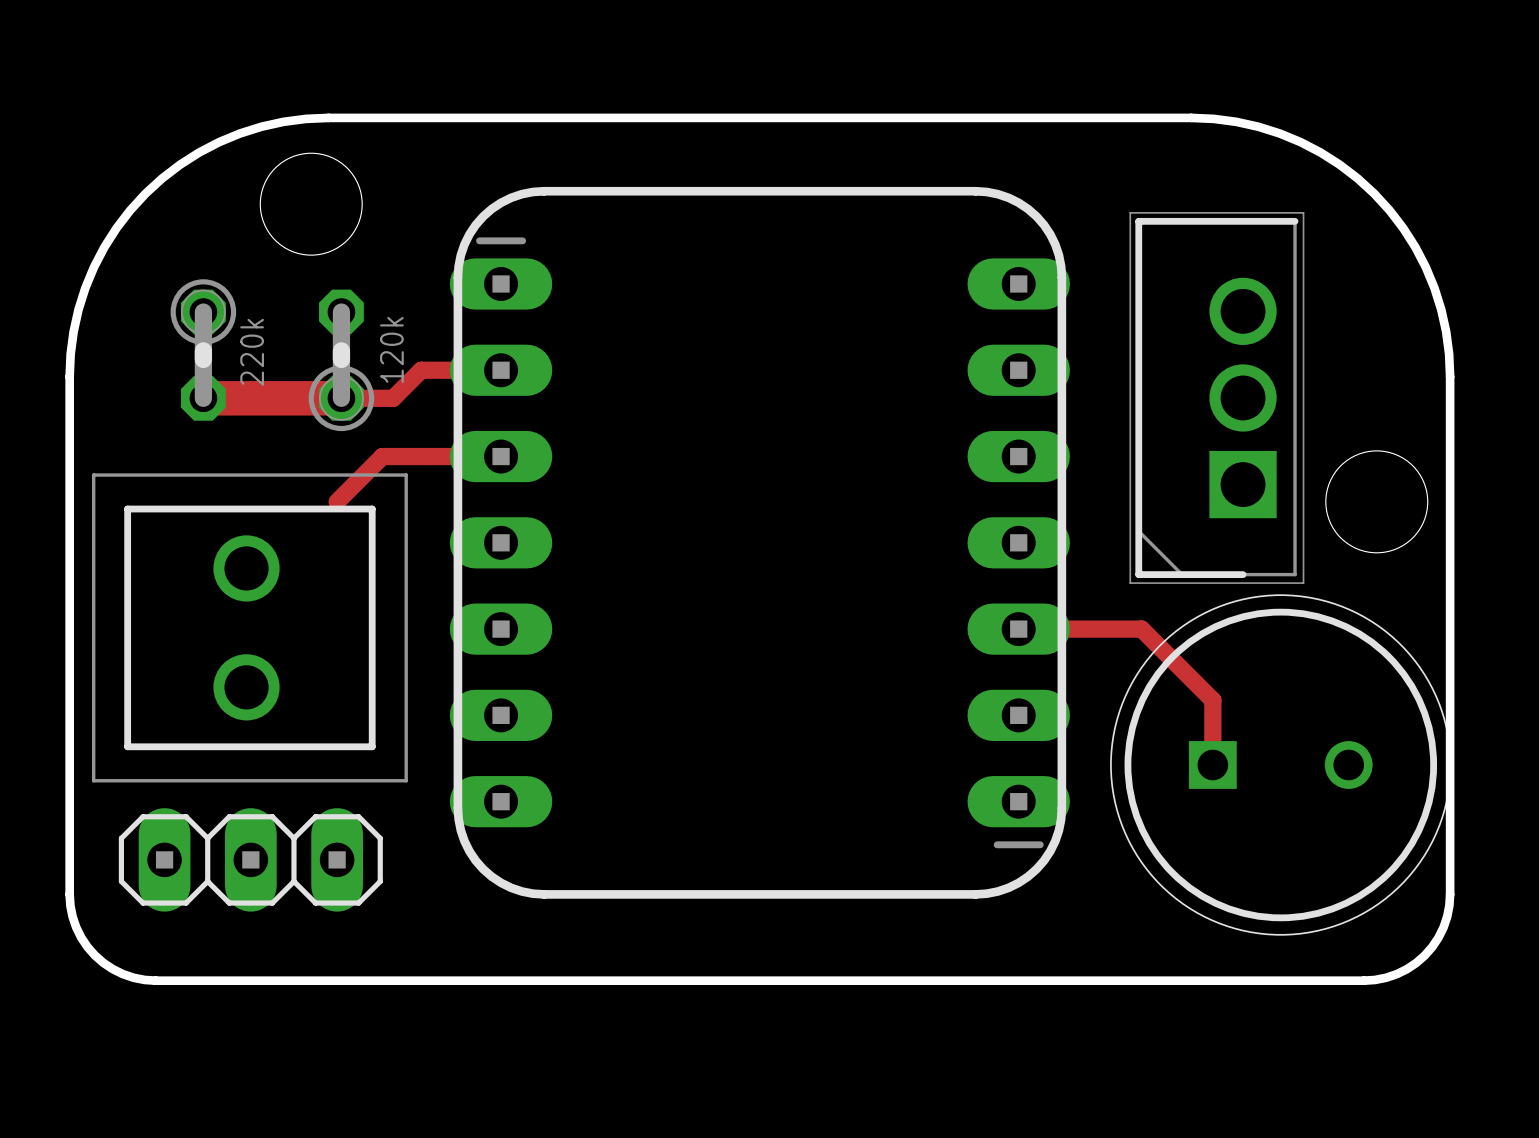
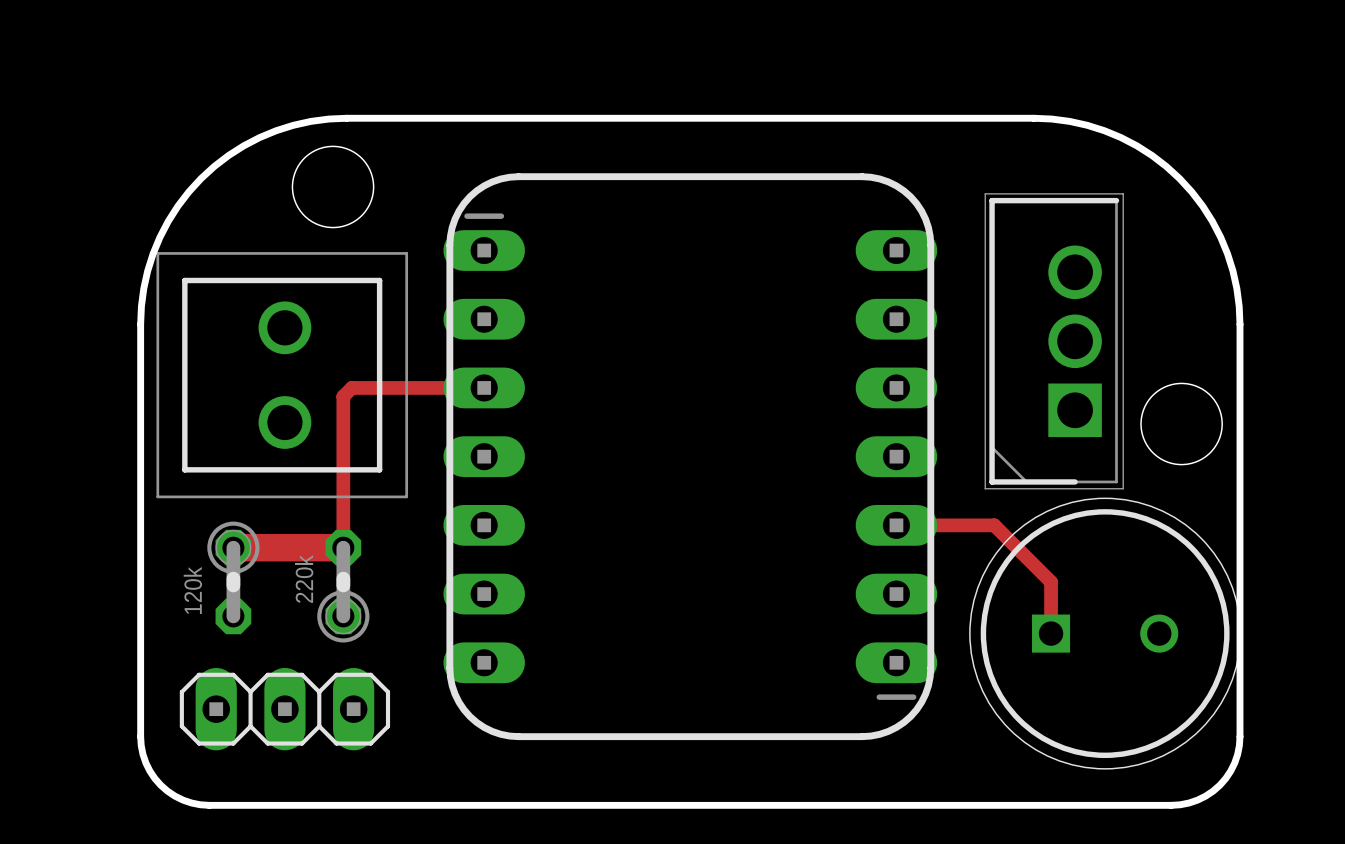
part rotation: 0° (203, 349) -> 180° (343, 586)
part position: (203, 349) -> (343, 586)
part rotation: 0° (341, 360) -> 180° (233, 577)
part position: (341, 360) -> (233, 577)
track: (501, 370) (421, 370) (393, 398) (203, 398) -> none
track: (382, 456) (337, 501) -> (389, 387) (351, 387) (343, 396) (343, 547) (233, 547)
part rotation: 0° (249, 627) -> 180° (282, 375)

